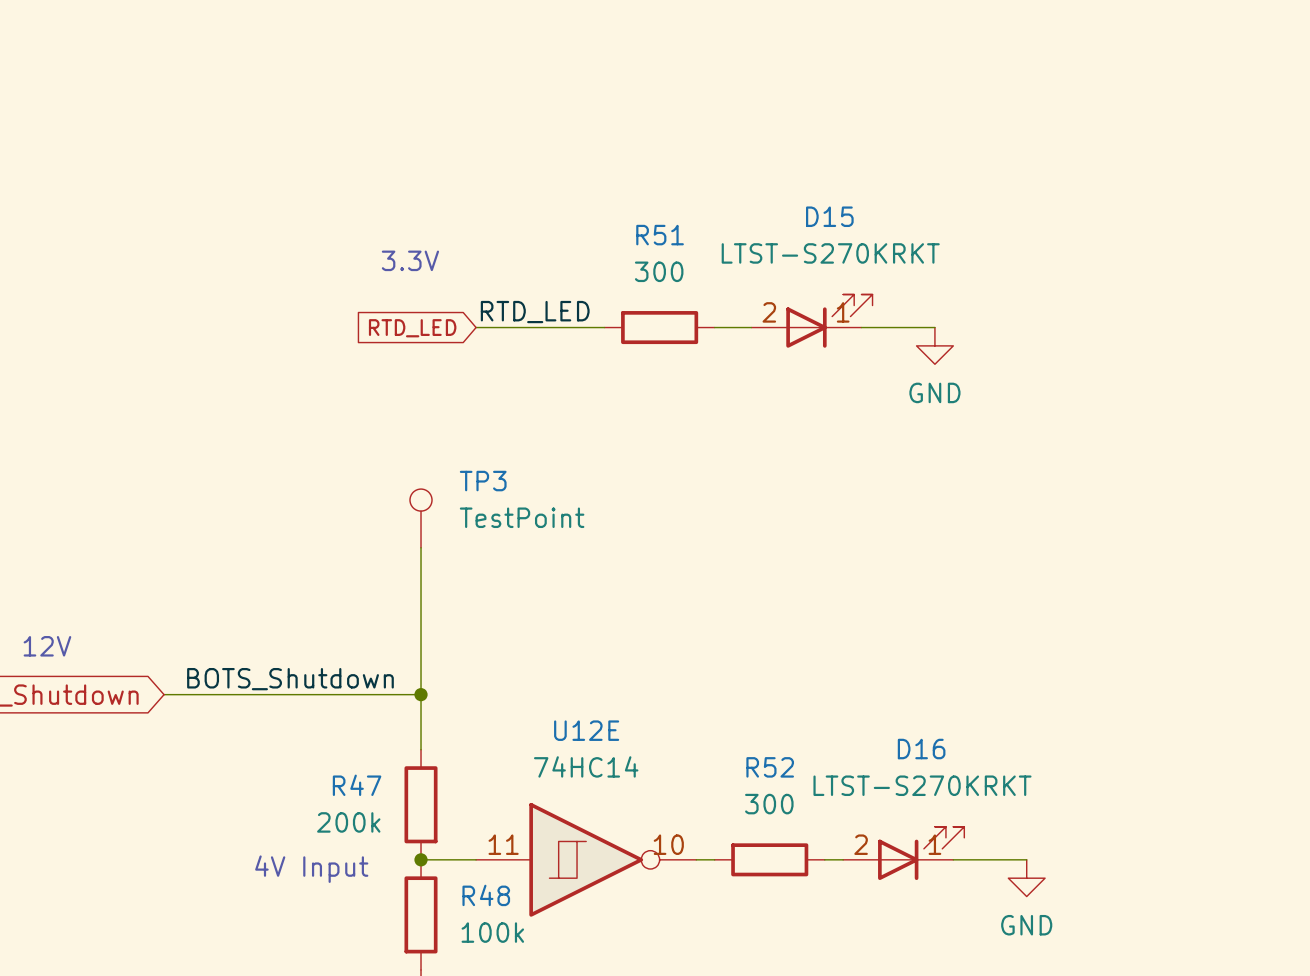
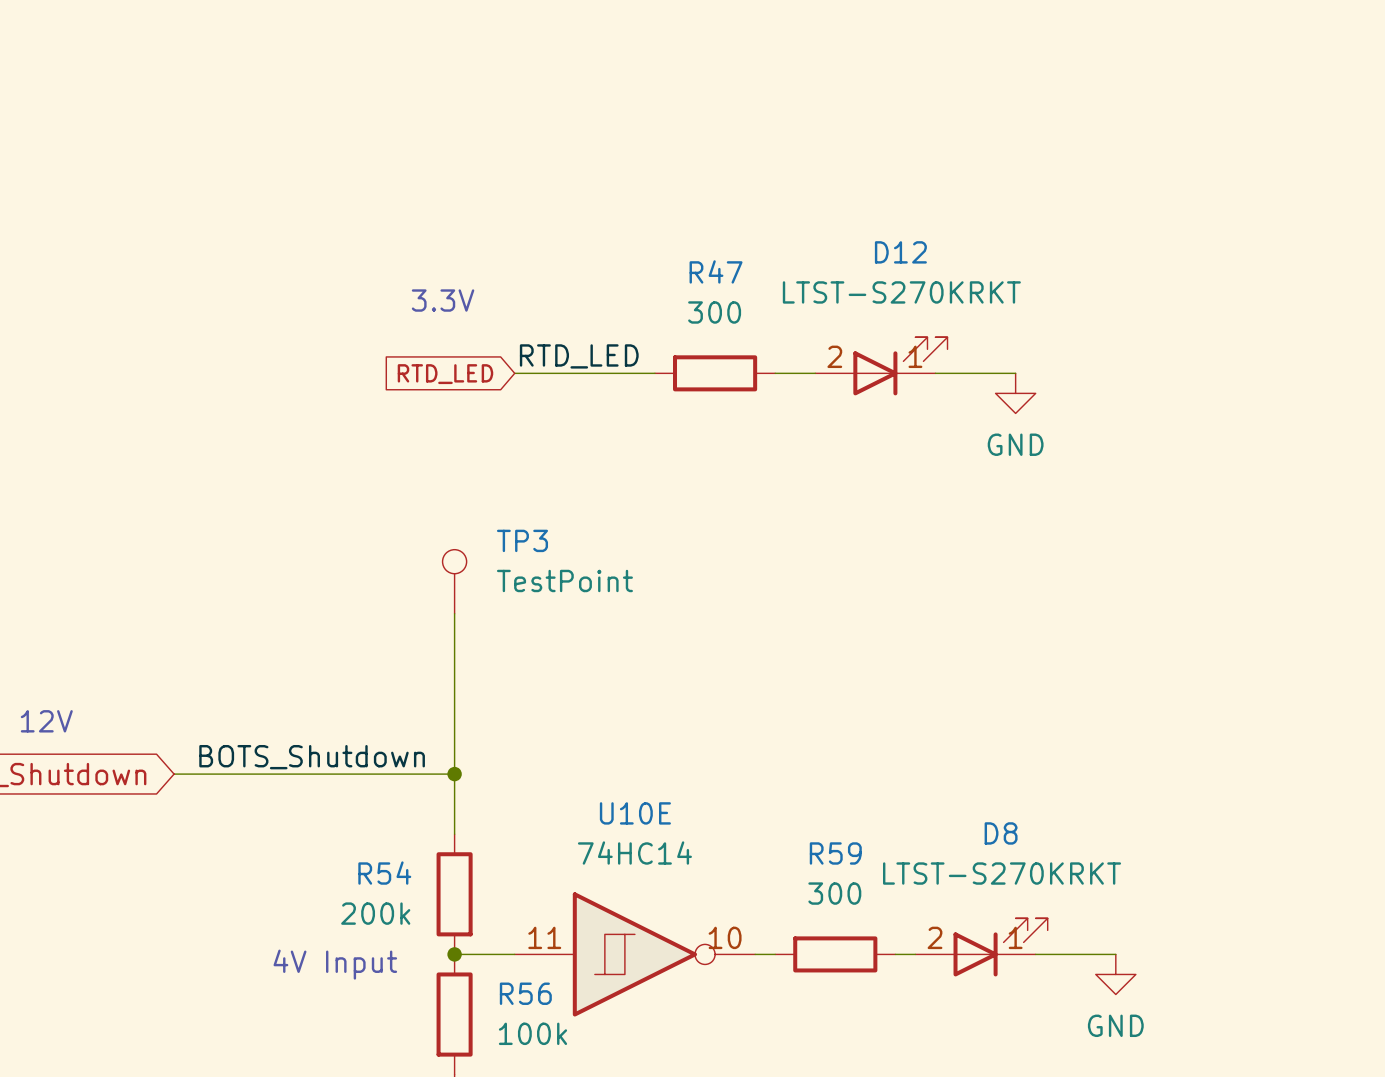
D15 name: D15 (829, 216) -> D12 (900, 252)
R51 name: R51 (660, 235) -> R47 (716, 271)
U12E name: U12E (586, 730) -> U10E (635, 813)
D16 name: D16 (921, 749) -> D8 (1001, 833)
R52 name: R52 (770, 767) -> R59 (835, 853)
R47 name: R47 (357, 785) -> R54 (384, 873)
R48 name: R48 (486, 895) -> R56 (525, 993)

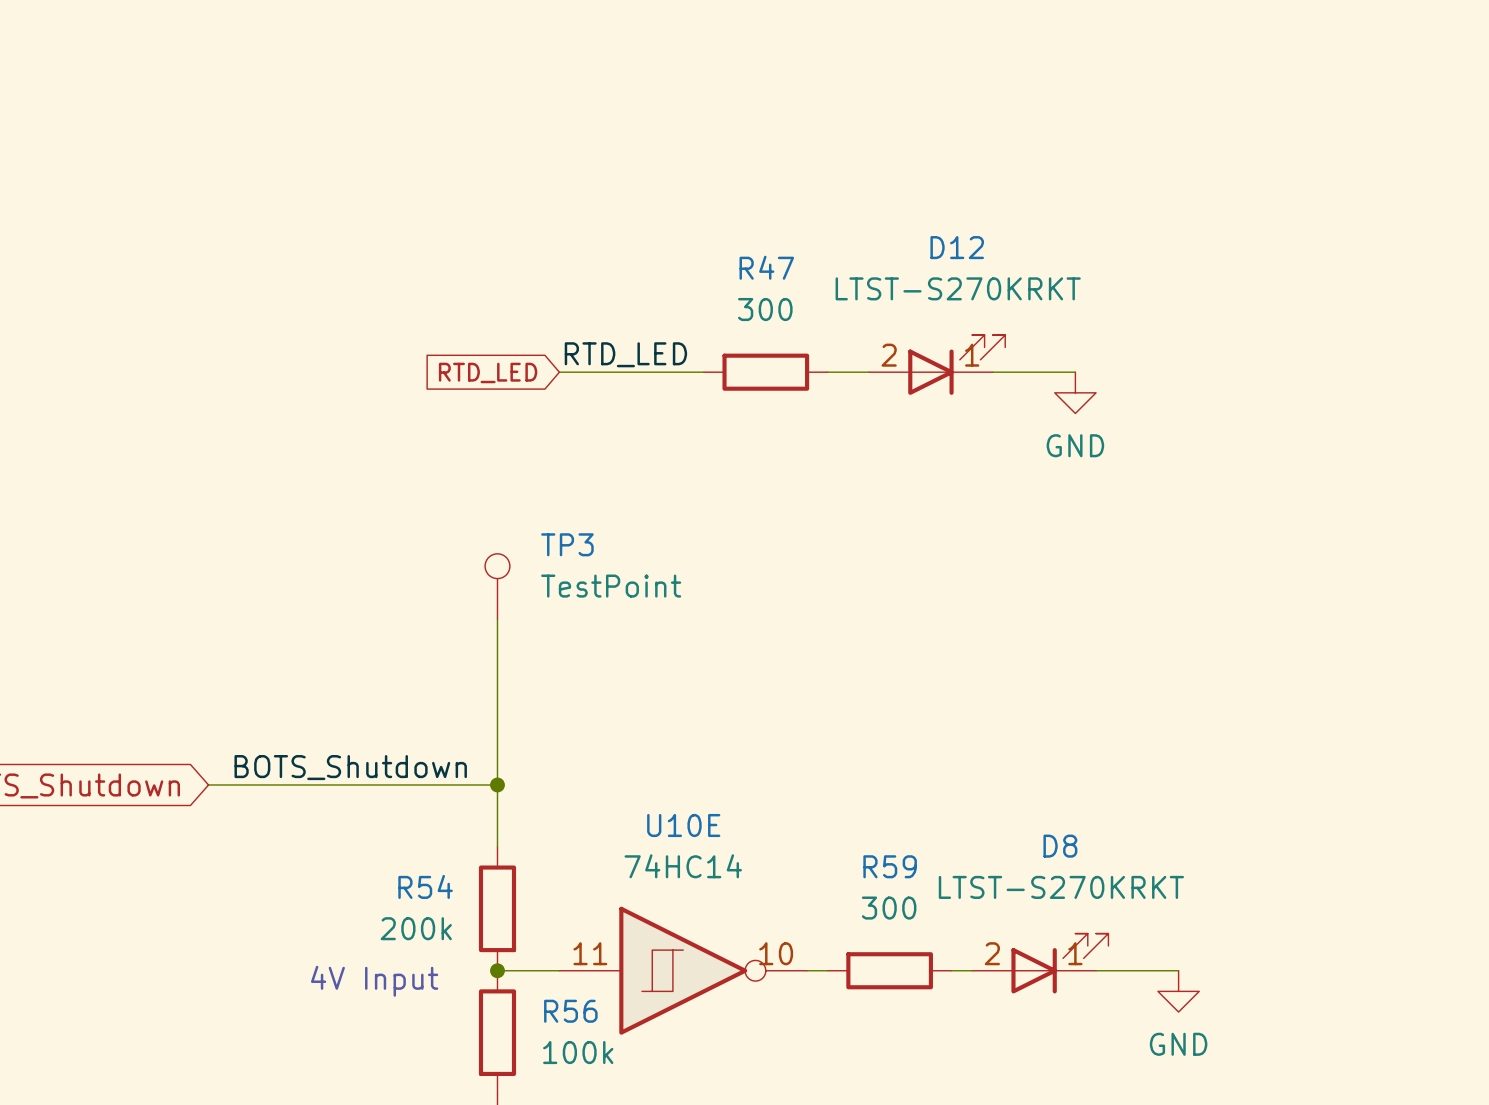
text: 3.3V (443, 300) -> none
text: 12V (46, 721) -> none

